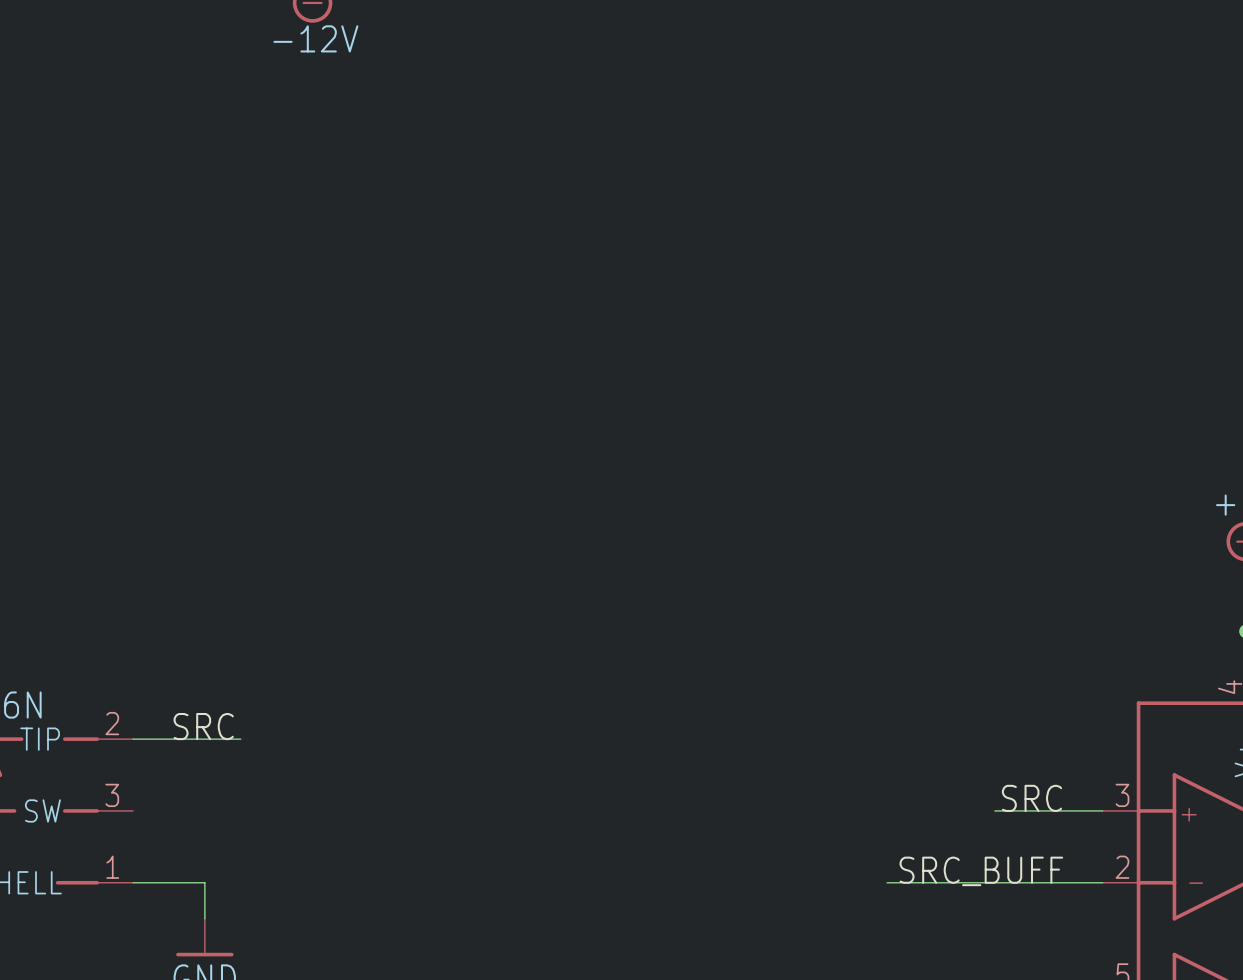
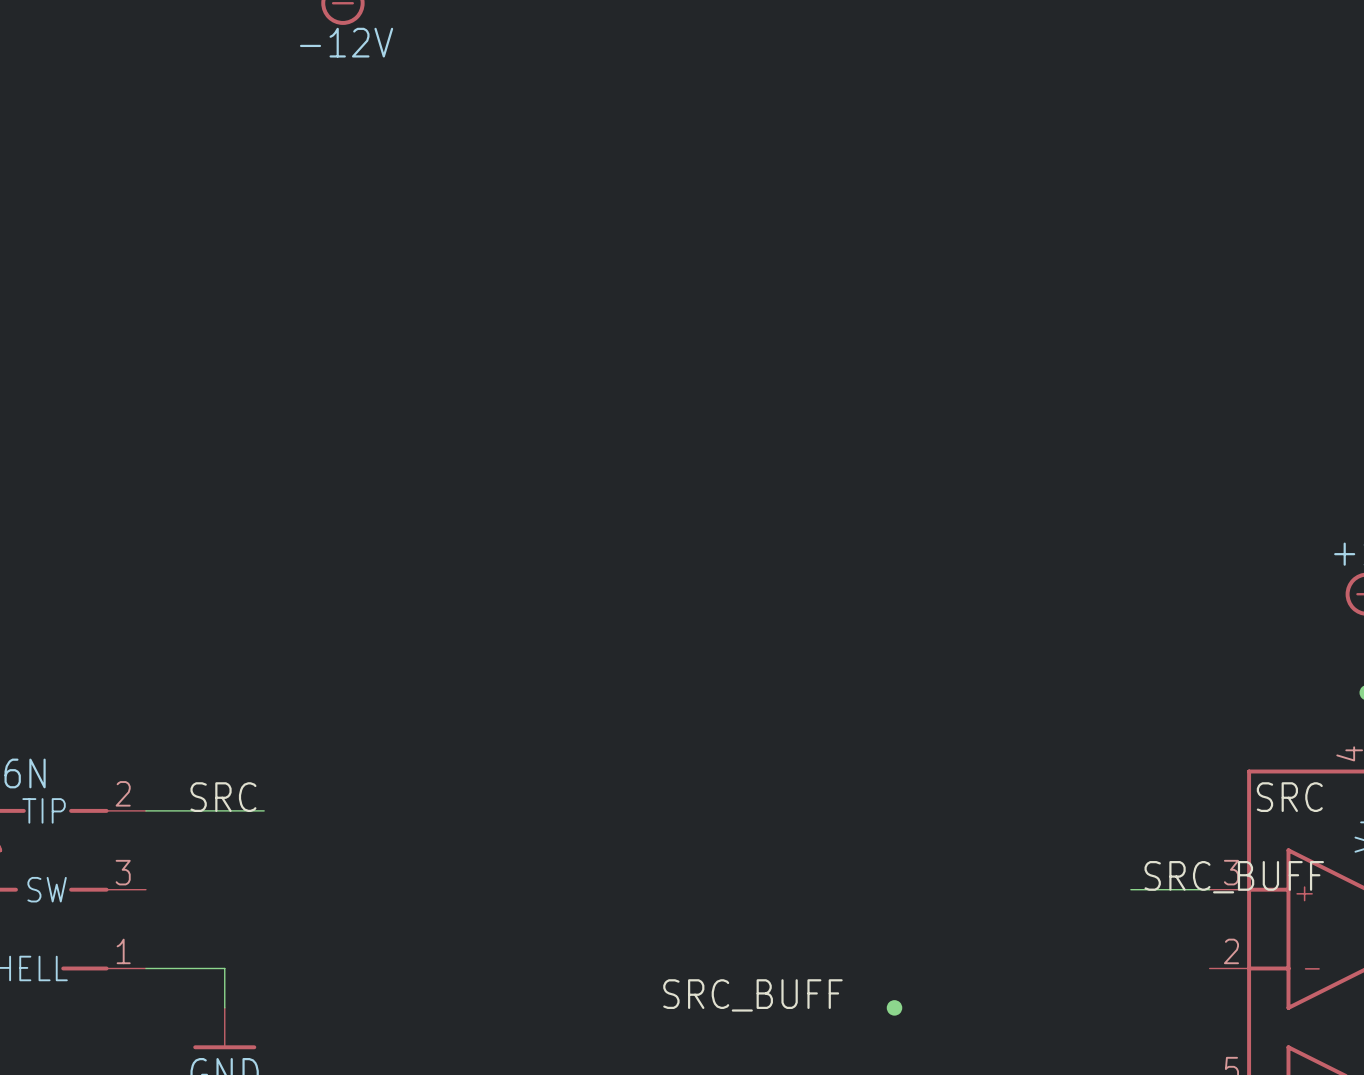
label position: SRC (1031, 798) -> SRC (1289, 797)
label: none -> SRC_BUFF (1234, 877)
wire: (994, 810) (1030, 810) -> none
label: SRC_BUFF (981, 871) -> none
wire: (887, 882) (1102, 882) -> none
label: none -> SRC_BUFF (752, 995)
junction: none -> (894, 1007)

